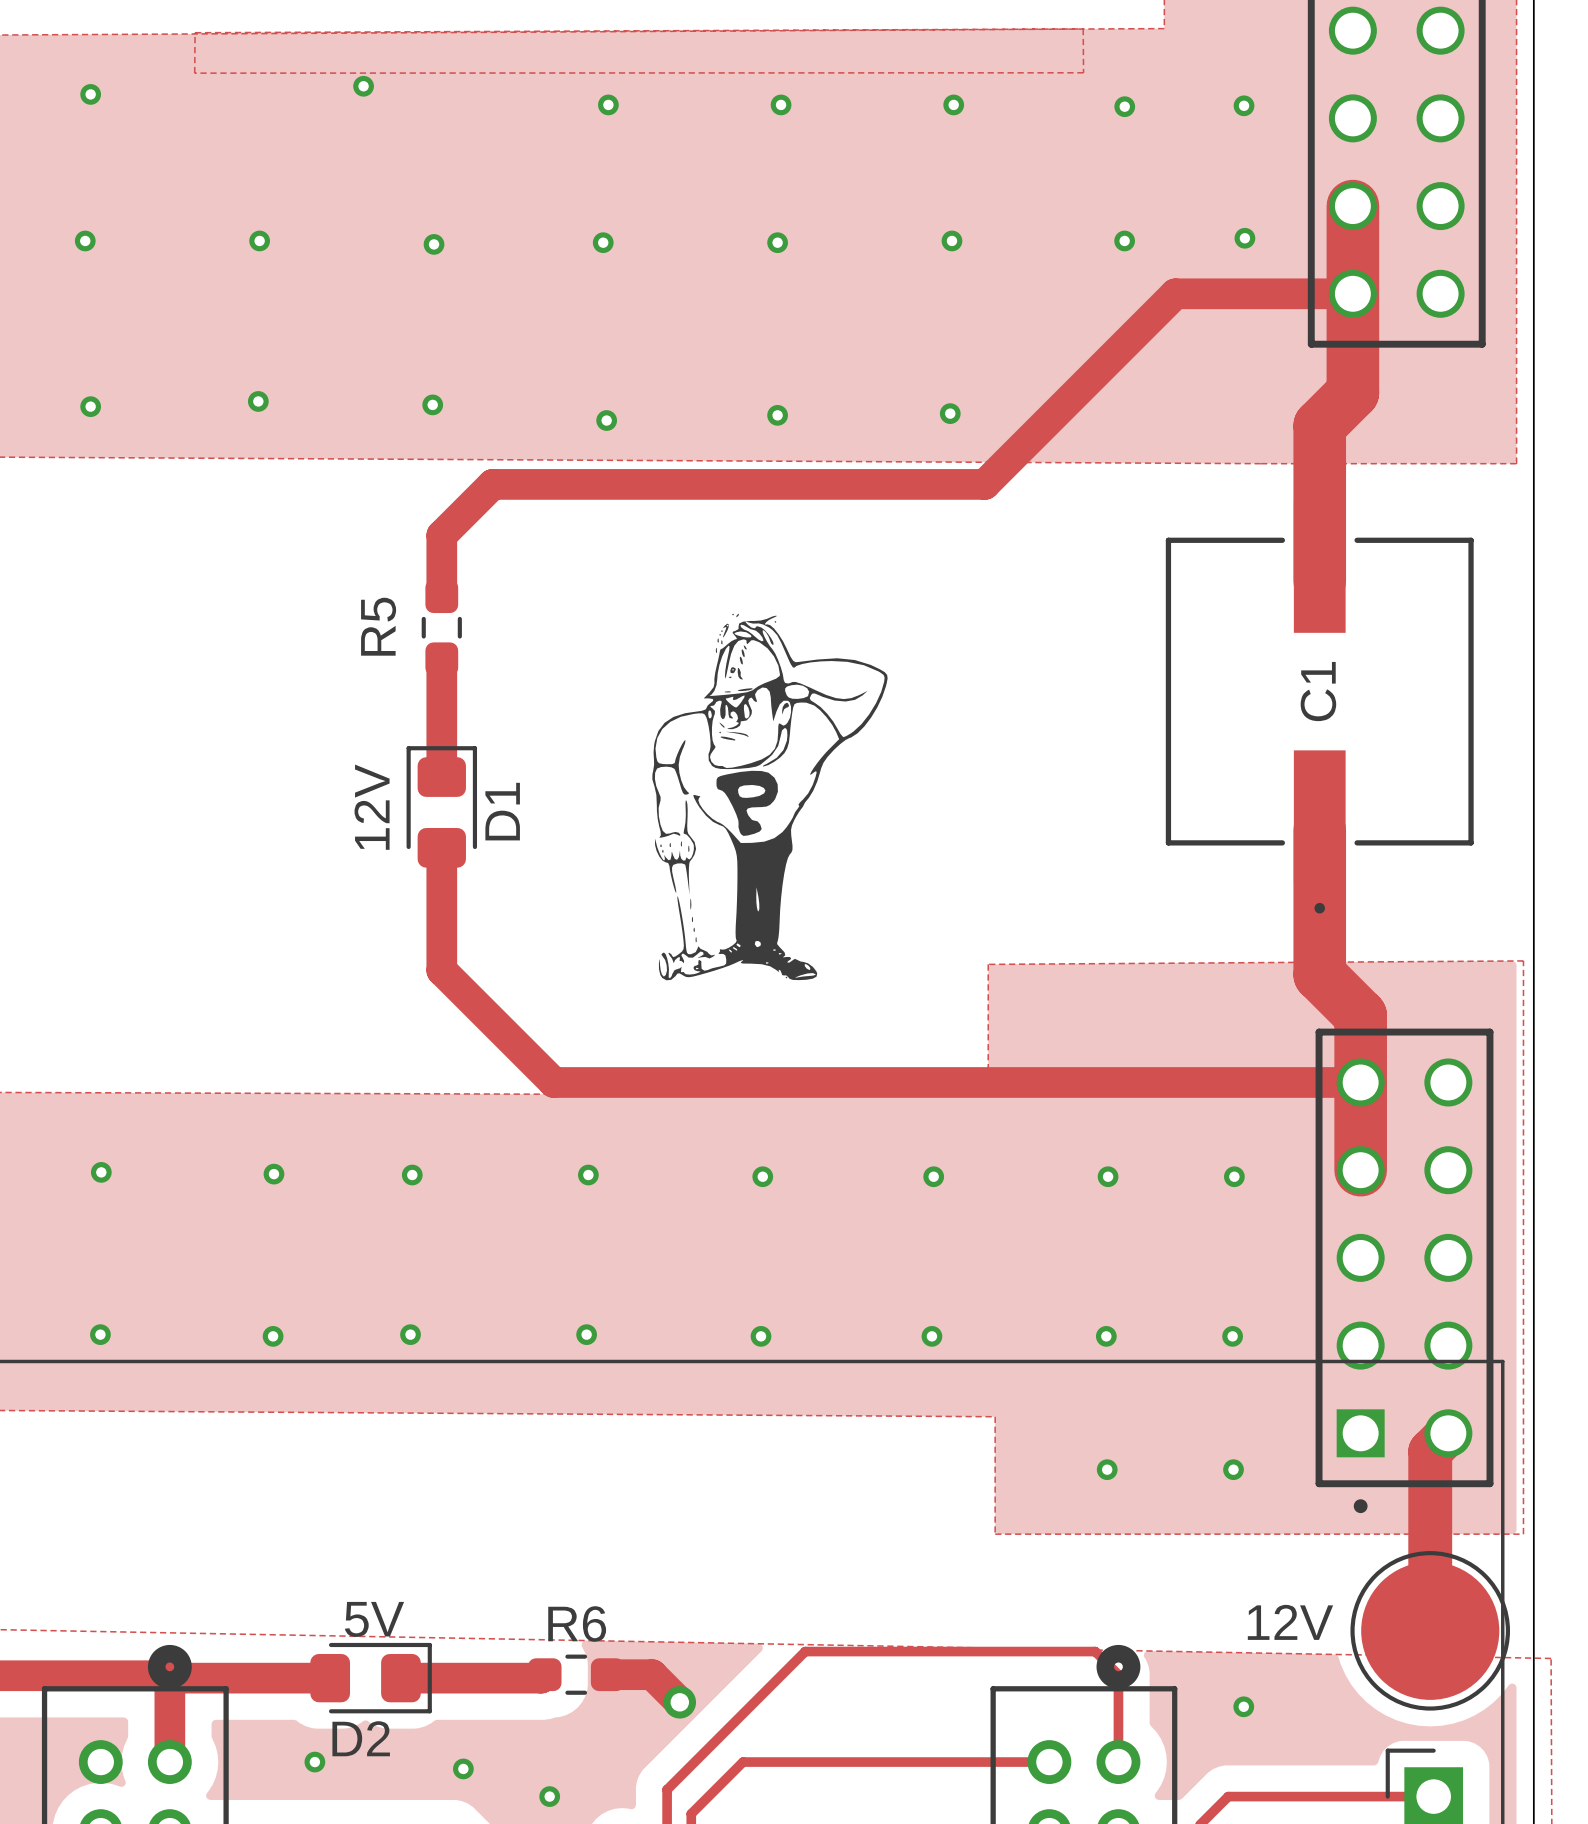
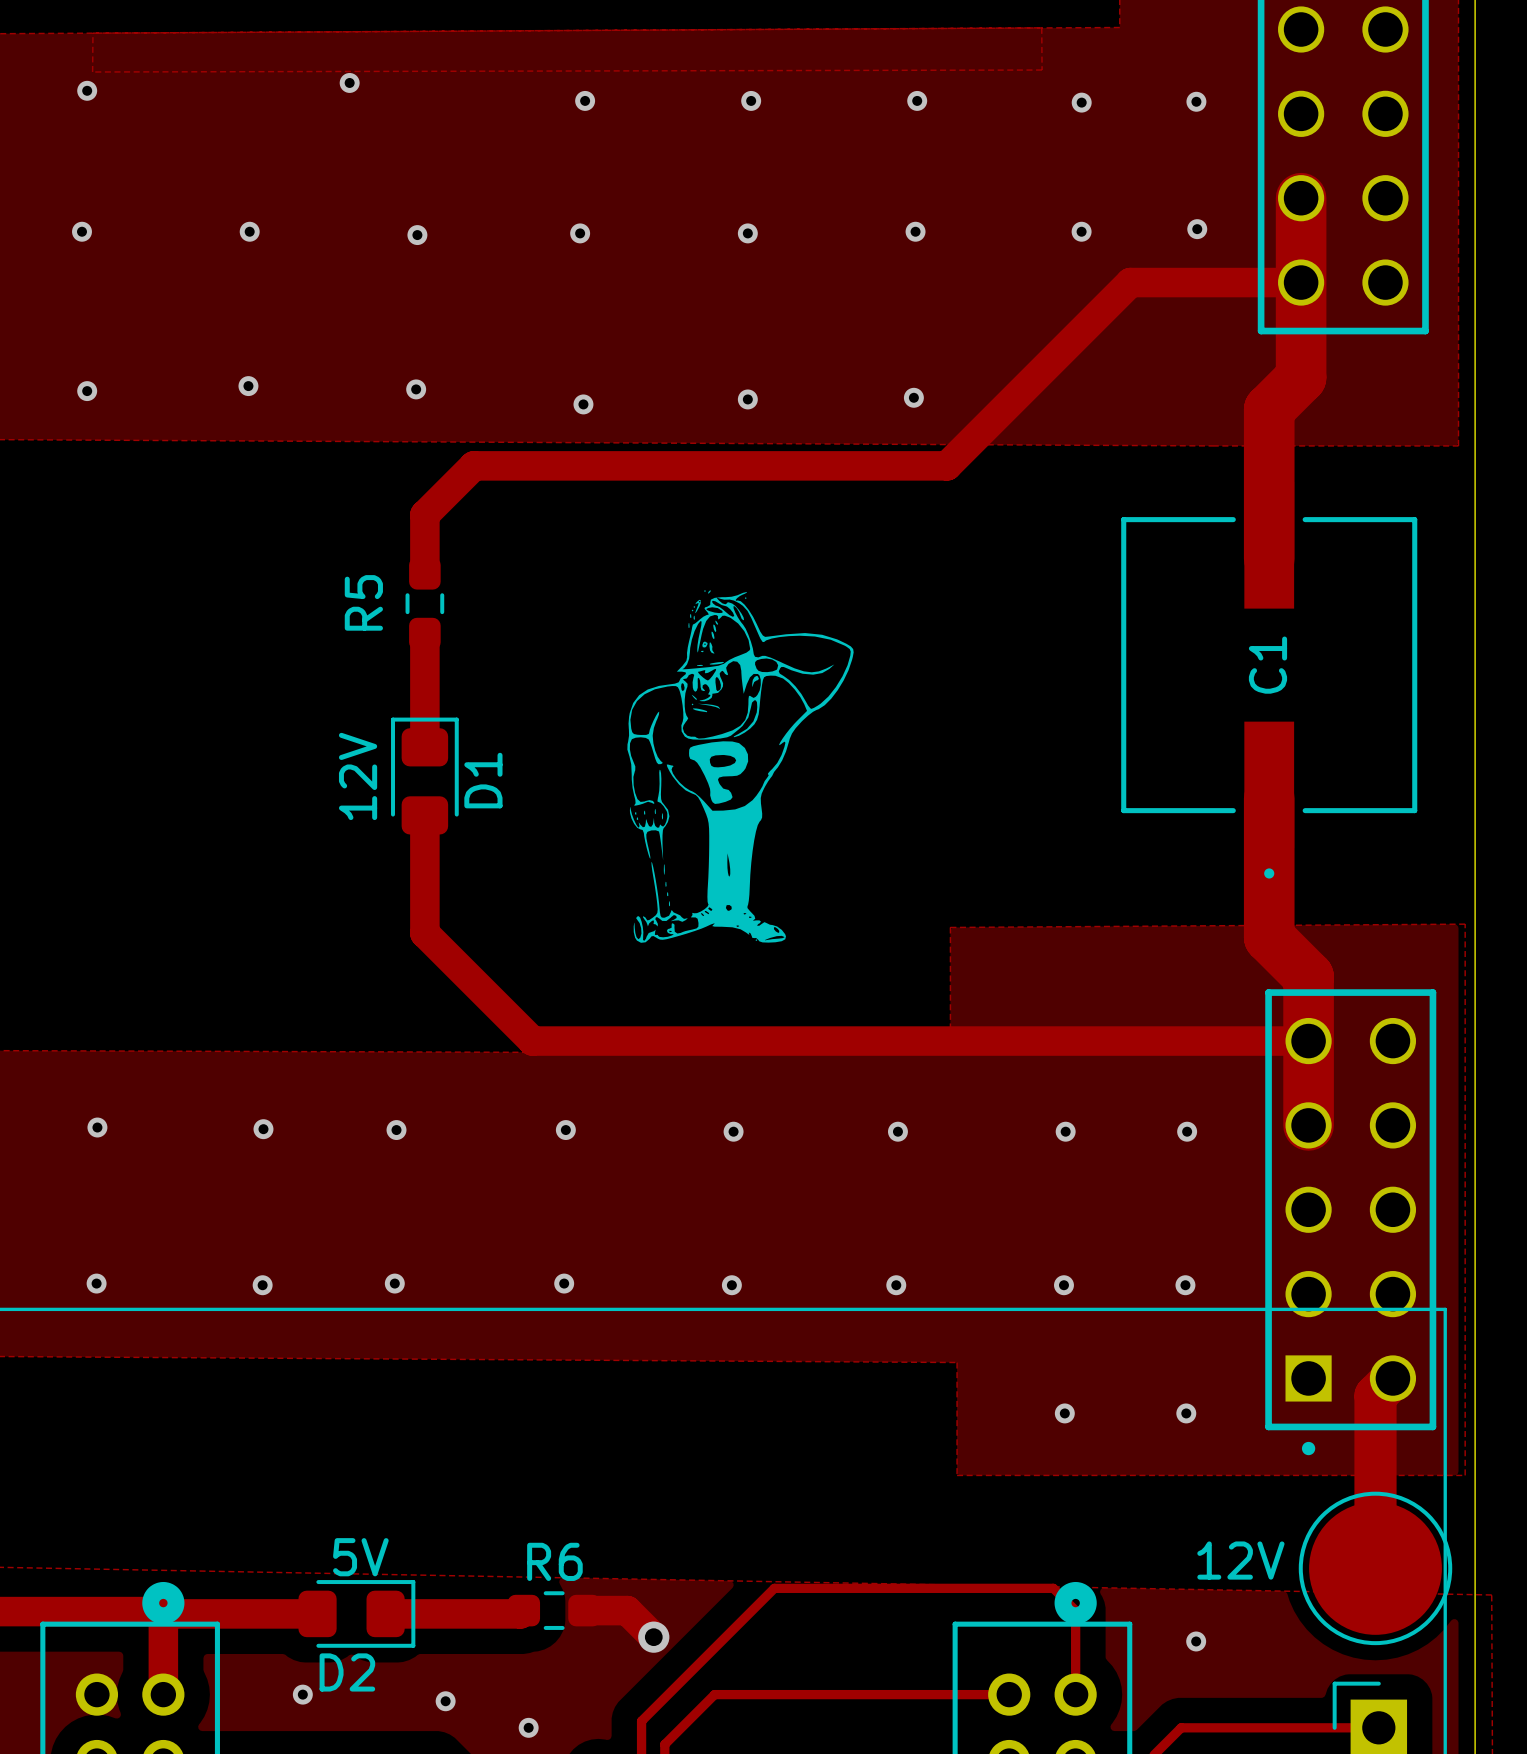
zone outline: (1083, 28) (195, 32) (194, 73) (1083, 72) -> (1041, 27) (92, 33) (92, 72) (1042, 70)

